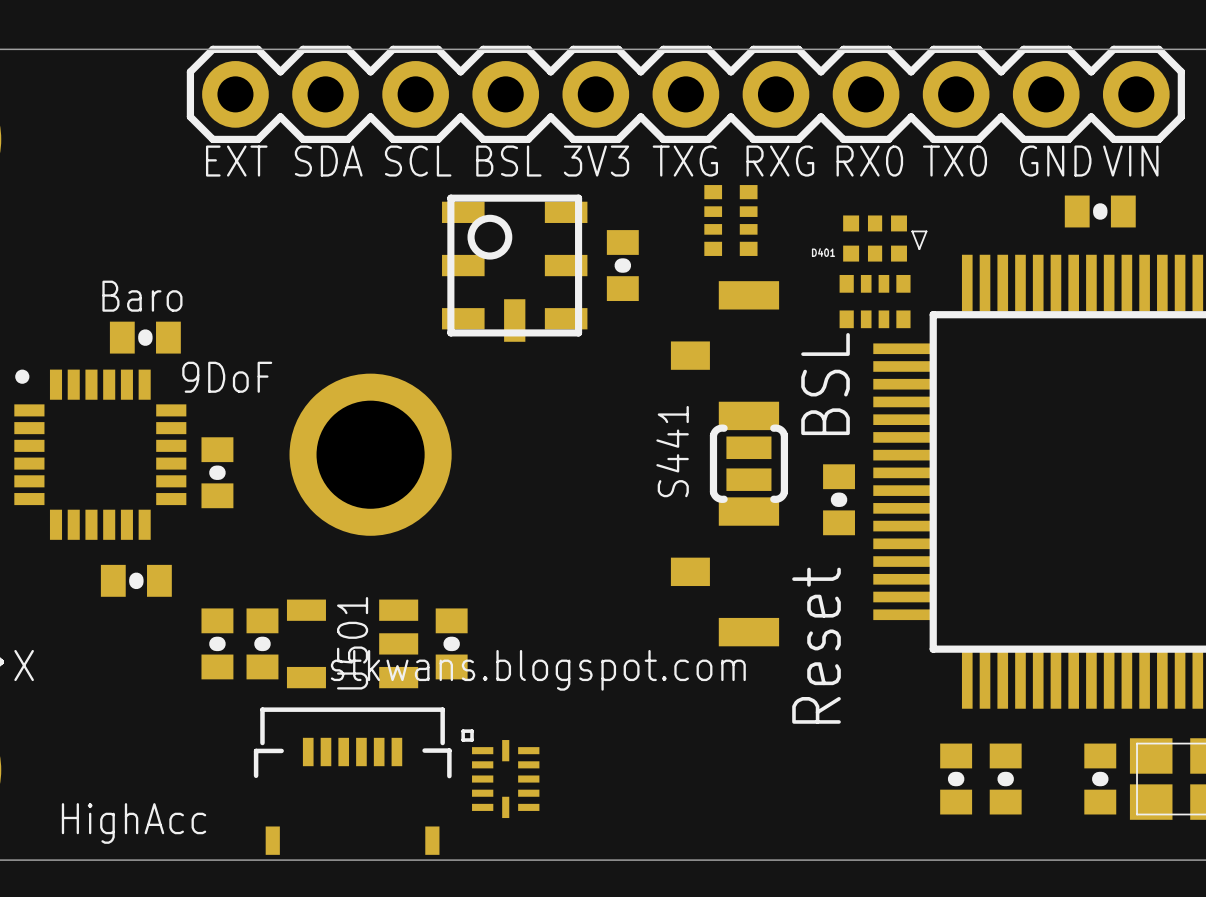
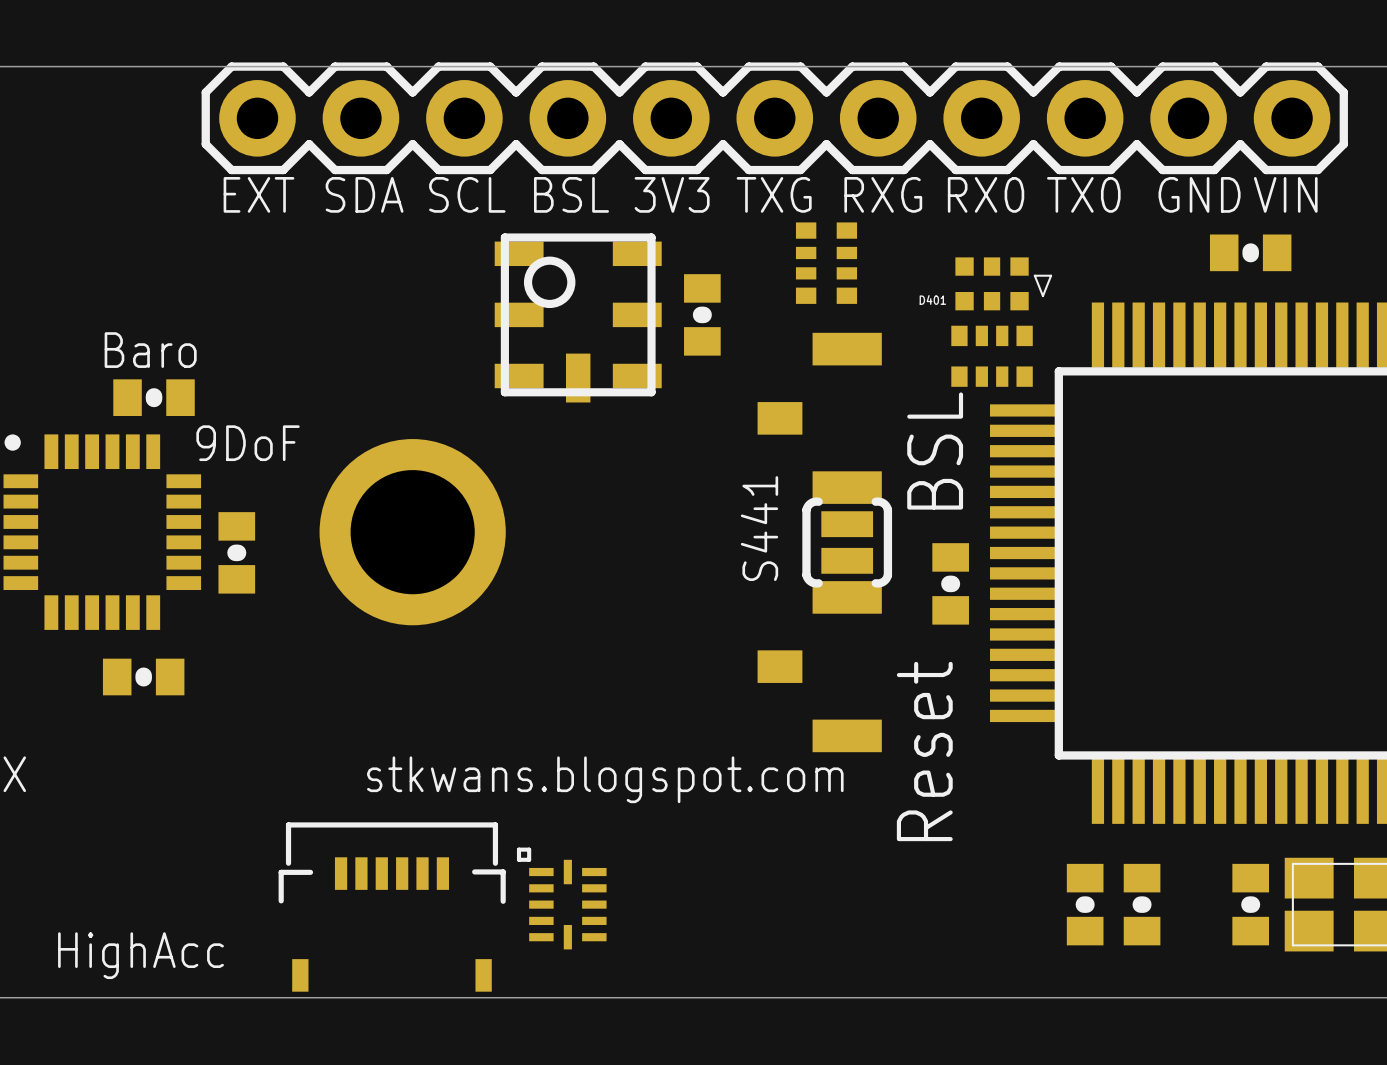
part: (217, 643) -> none
part: (262, 643) -> none
U501: (352, 643) -> none
part: (451, 643) -> none

